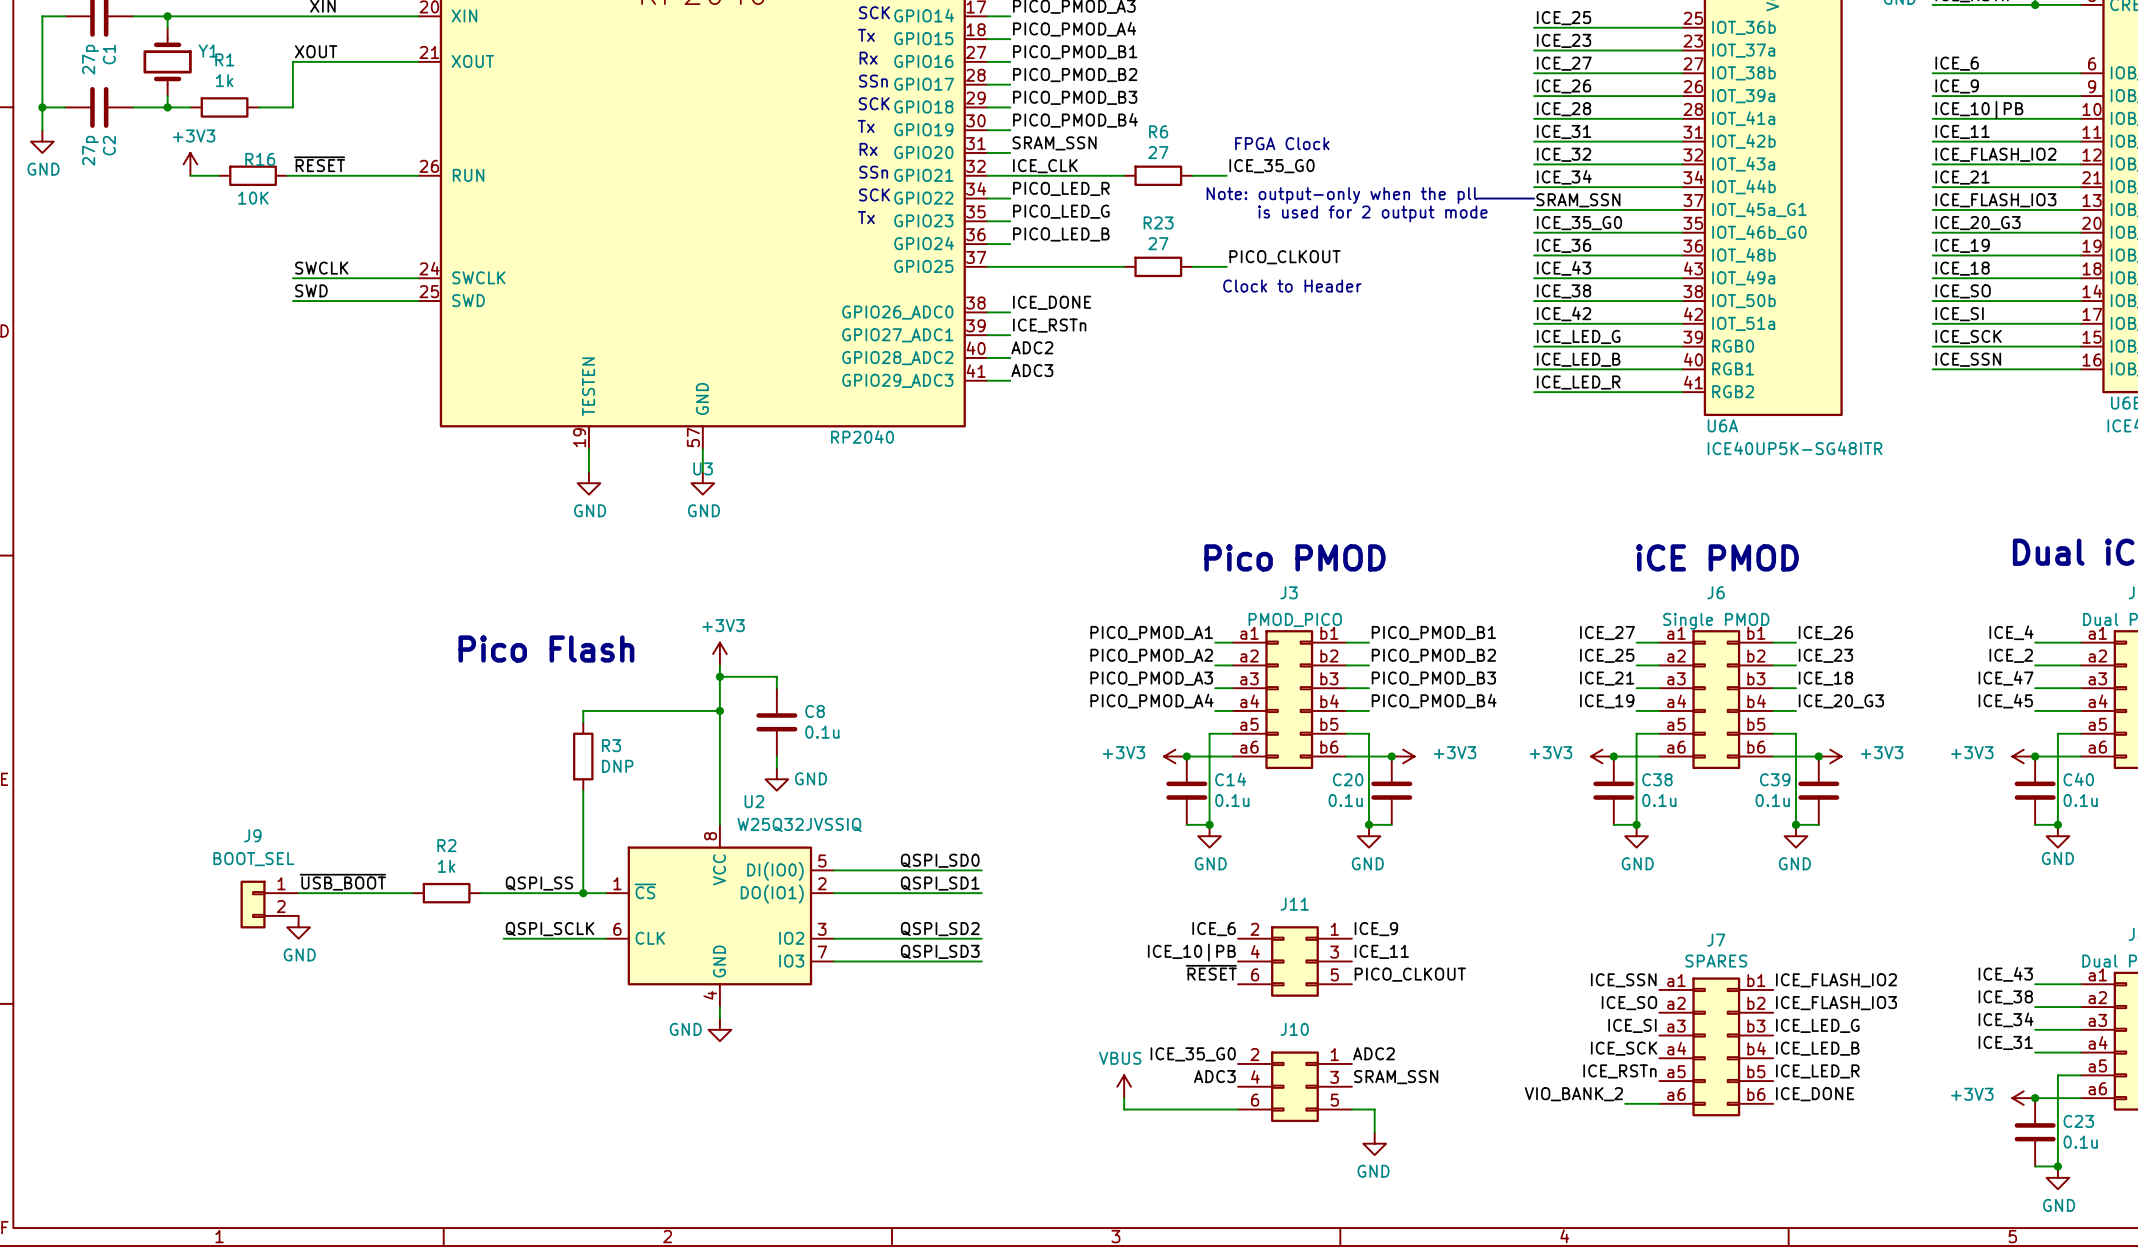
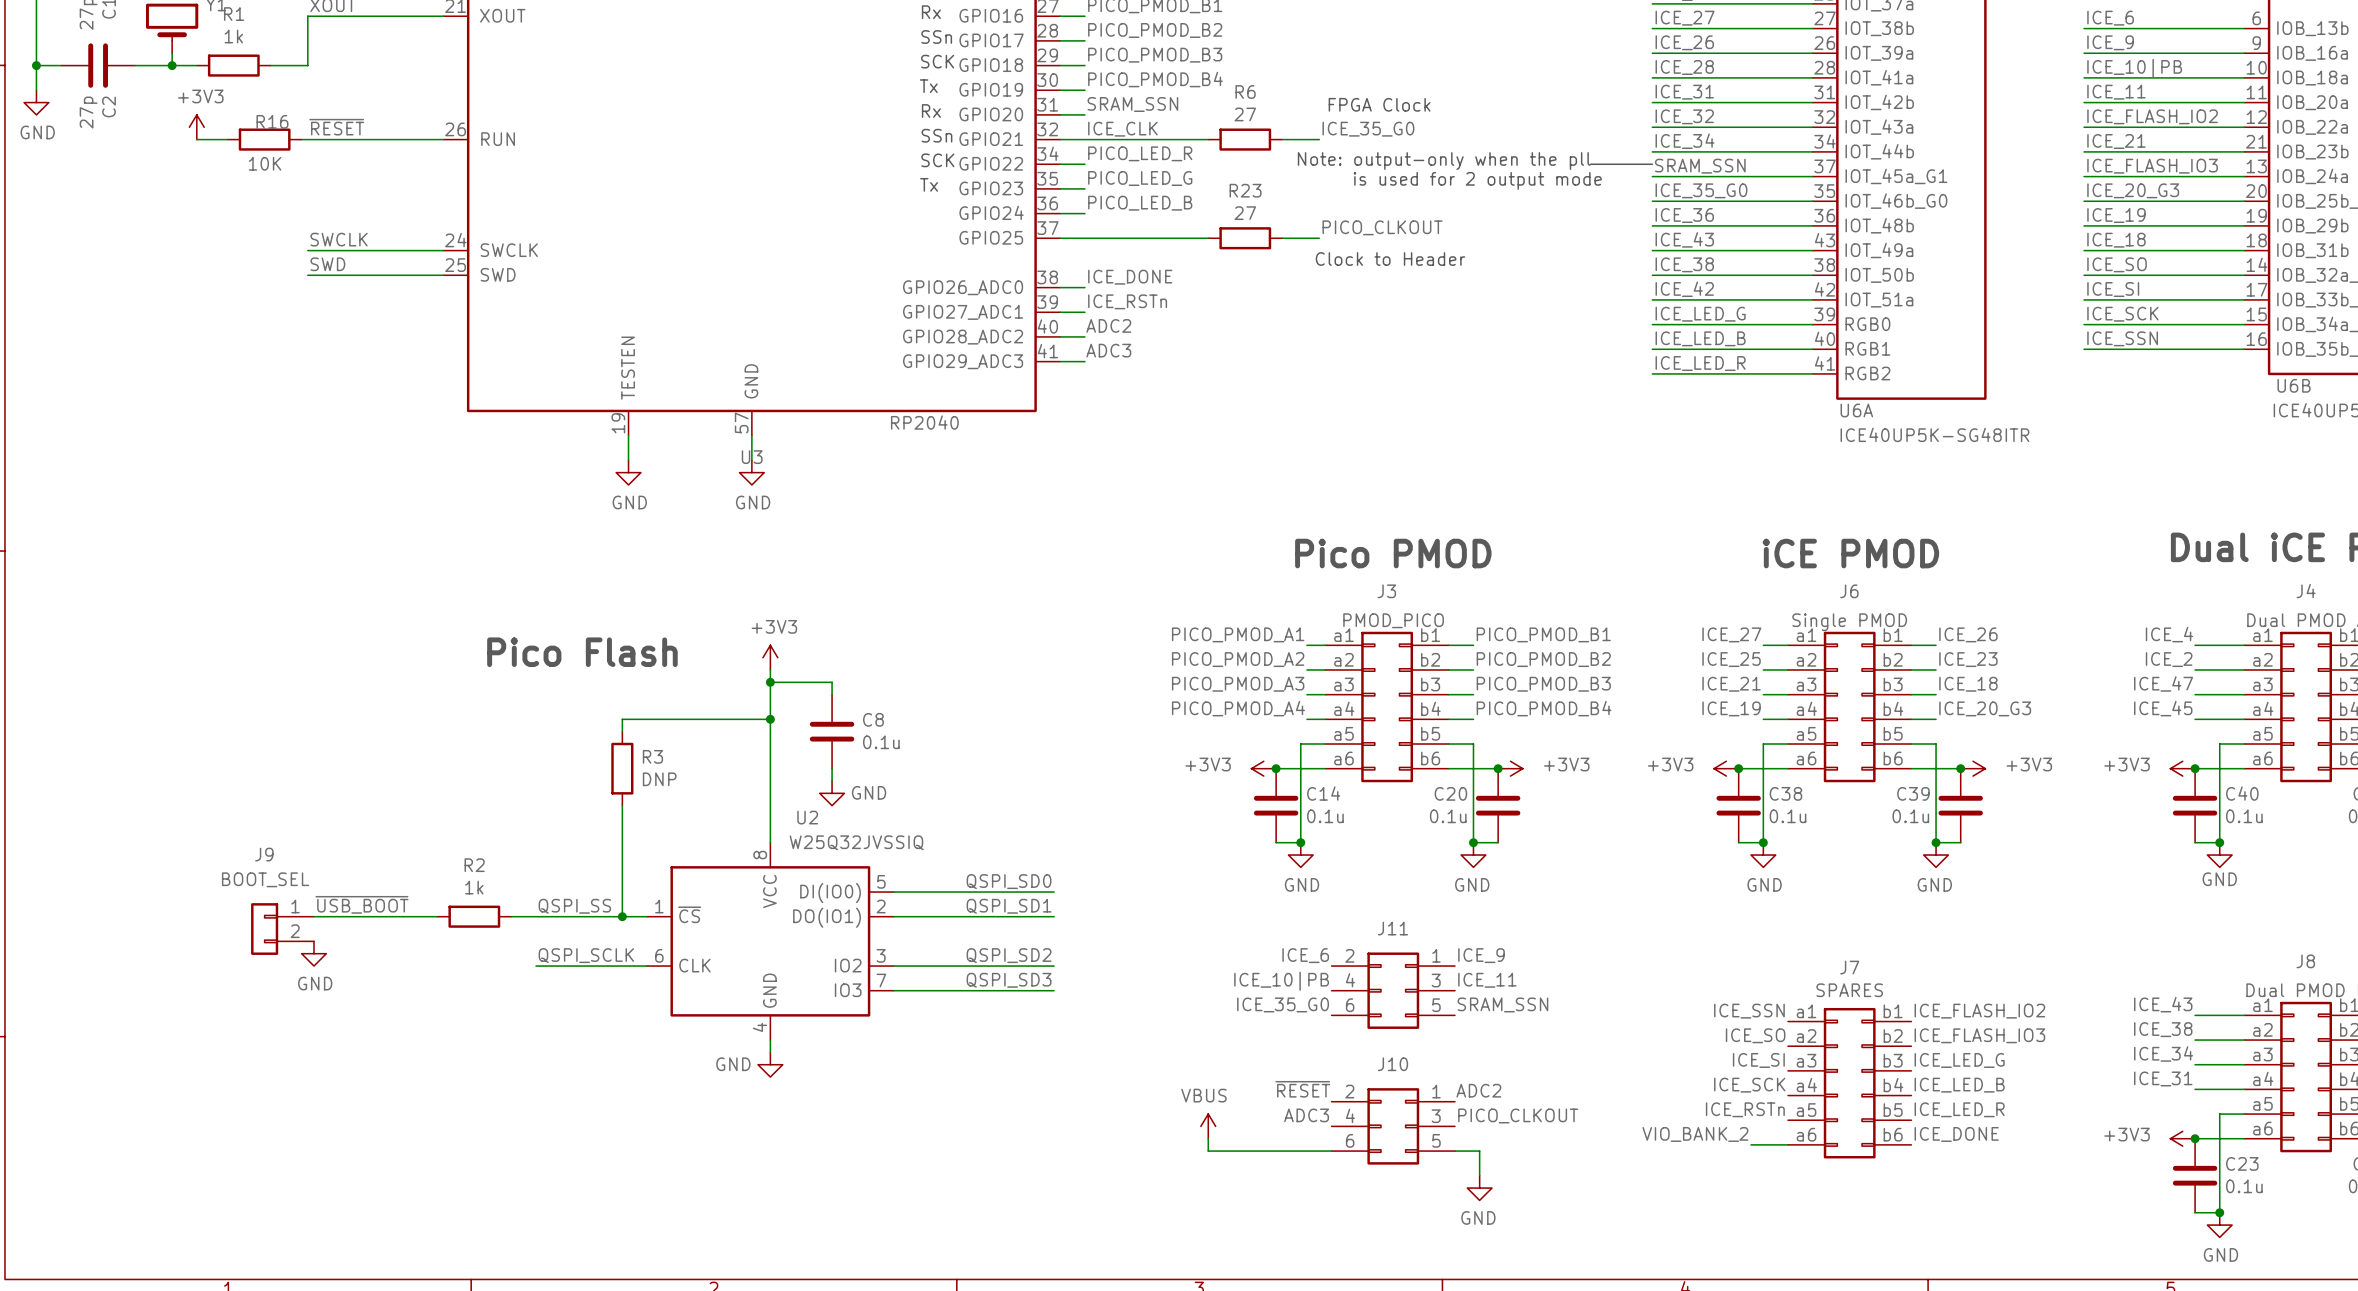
label: ~{RESET} (1211, 972) -> ICE_35_G0 (1283, 1004)
label: PICO_CLKOUT (1410, 974) -> SRAM_SSN (1502, 1004)
label: ICE_35_G0 (1193, 1054) -> ~{RESET} (1302, 1089)
label: SRAM_SSN (1396, 1077) -> PICO_CLKOUT (1518, 1115)

